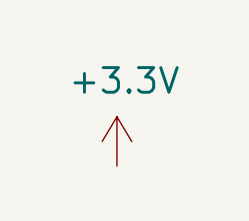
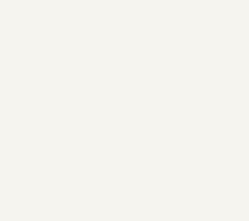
power symbol: +3.3V (116, 141) -> none

